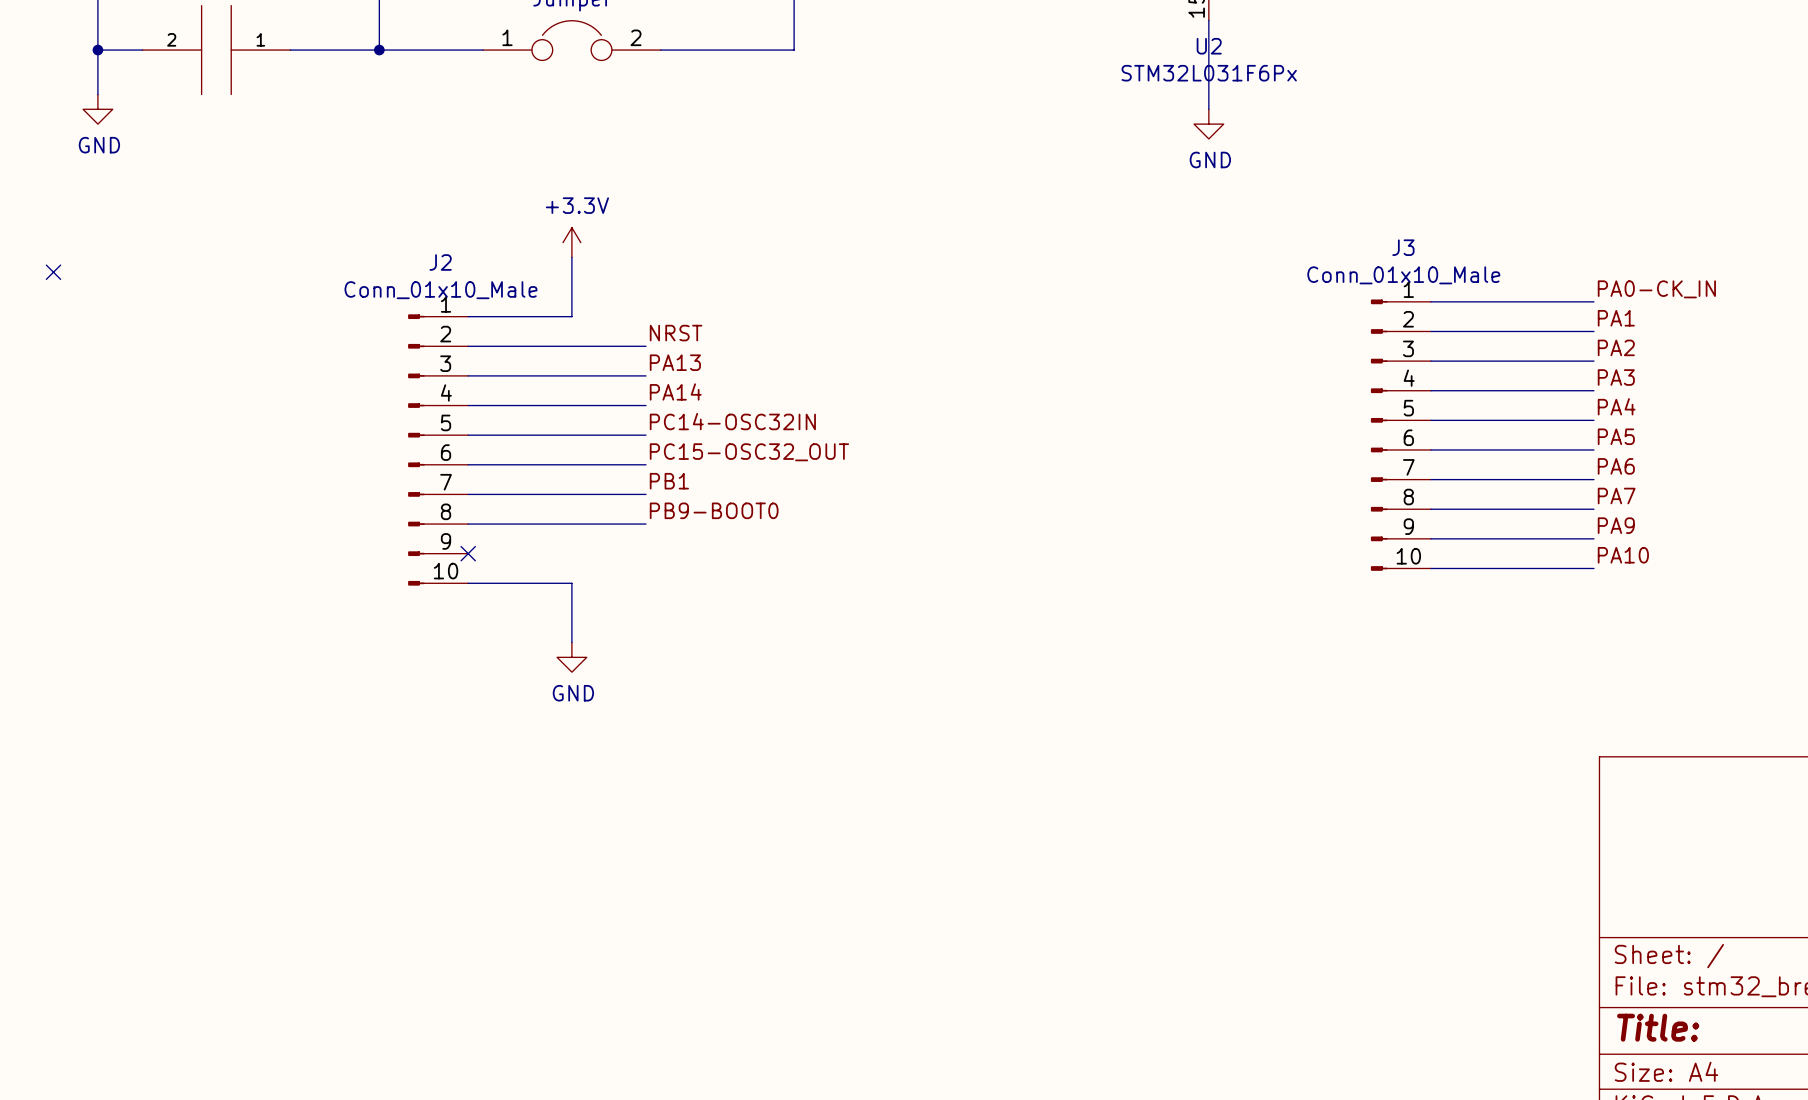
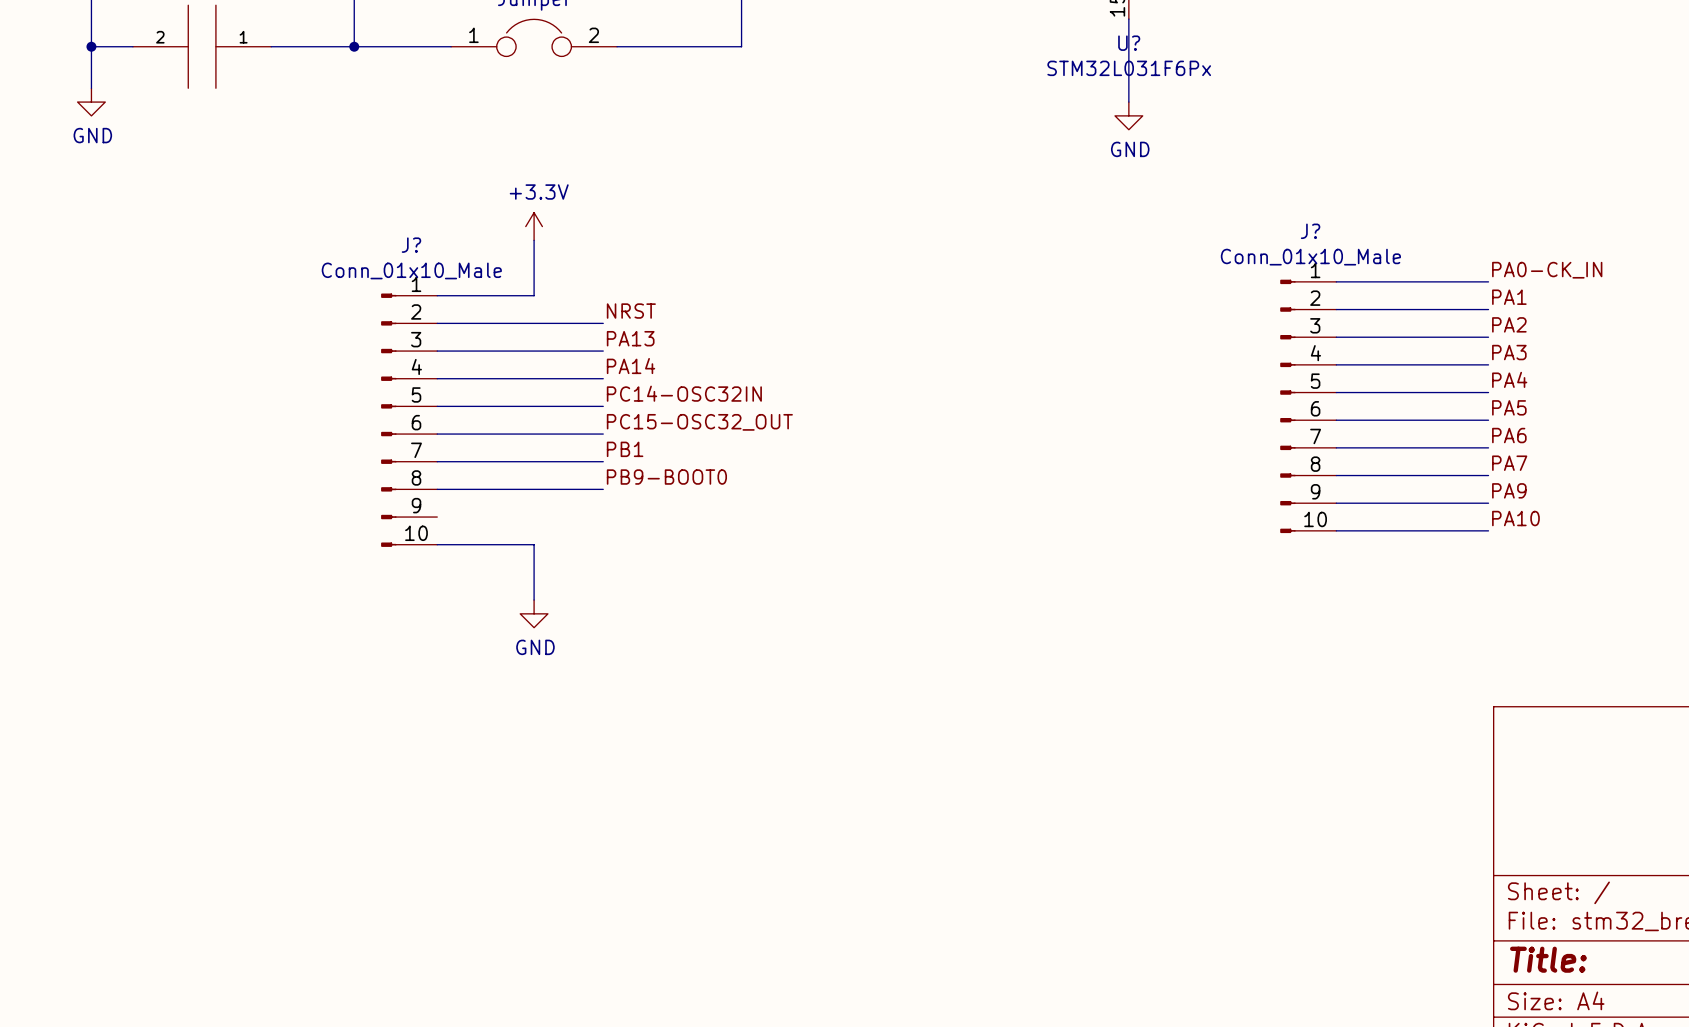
U2 name: U2 (1209, 46) -> U? (1129, 43)
J3 name: J3 (1403, 247) -> J? (1310, 231)
J2 name: J2 (440, 262) -> J? (411, 245)
no-connect mark: (53, 272) -> none
no-connect mark: (468, 553) -> none

